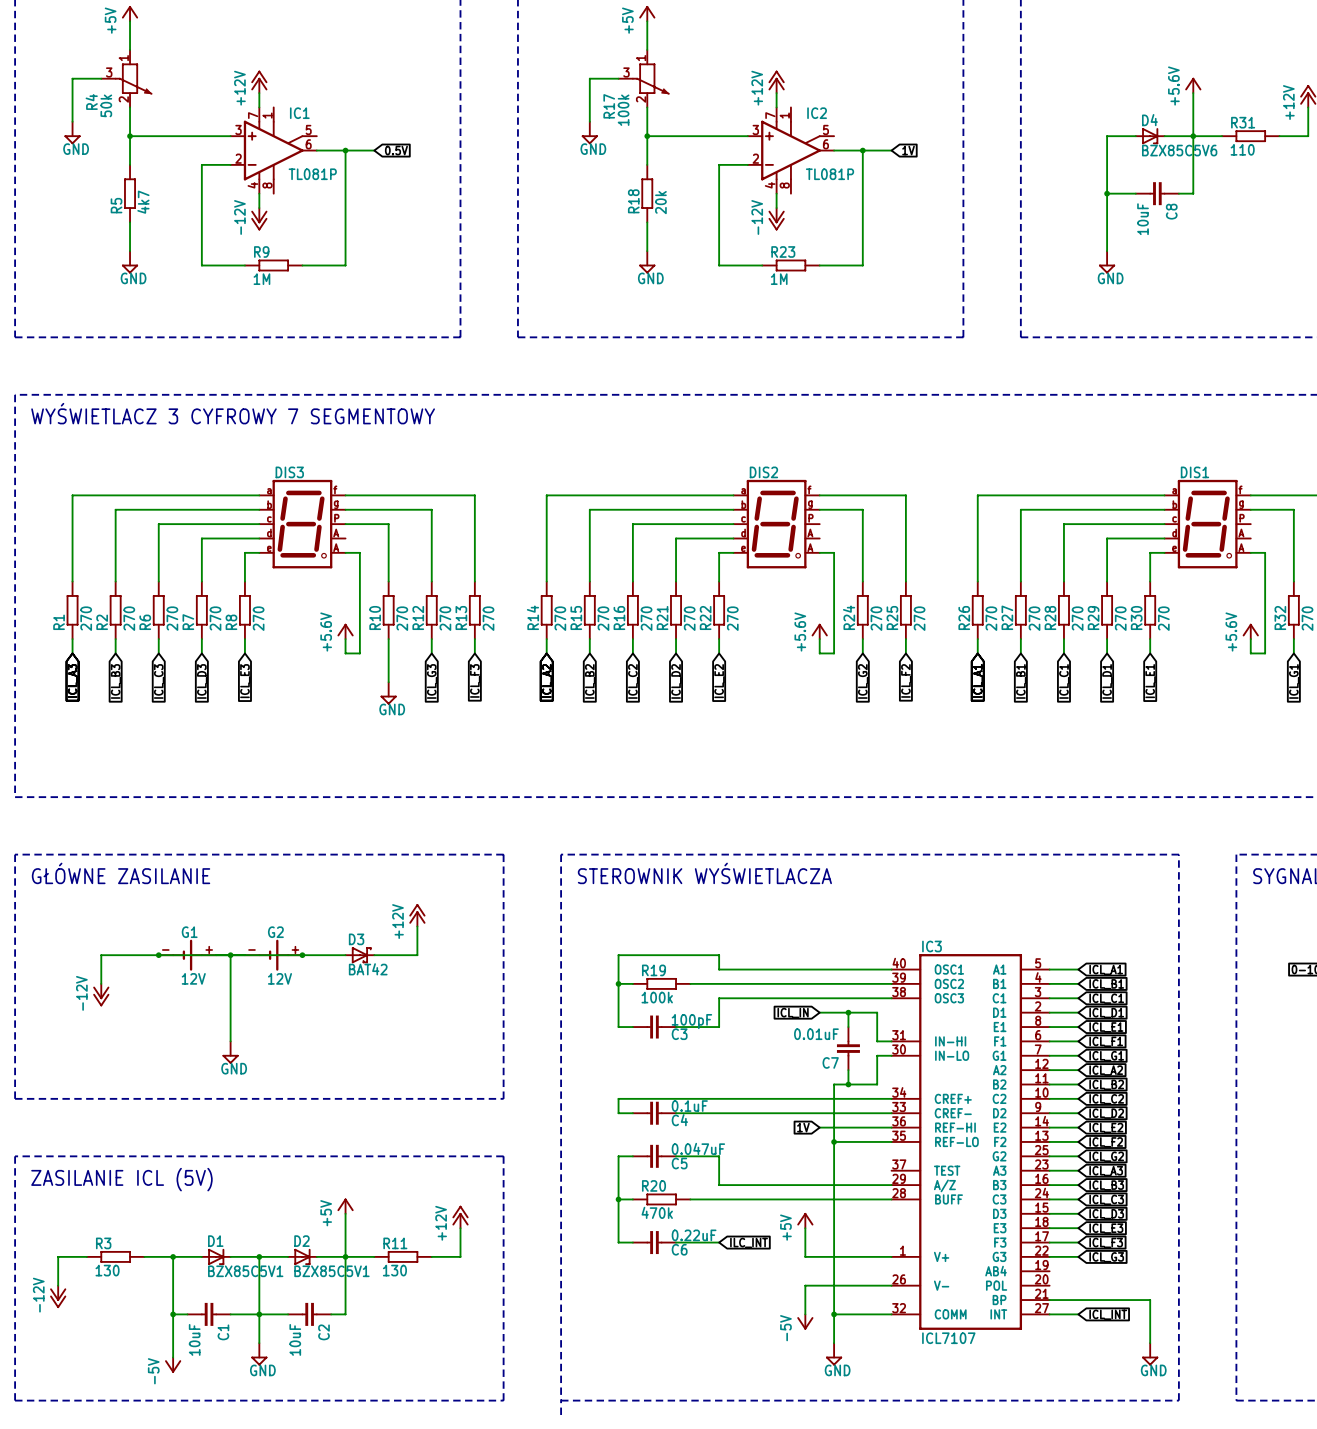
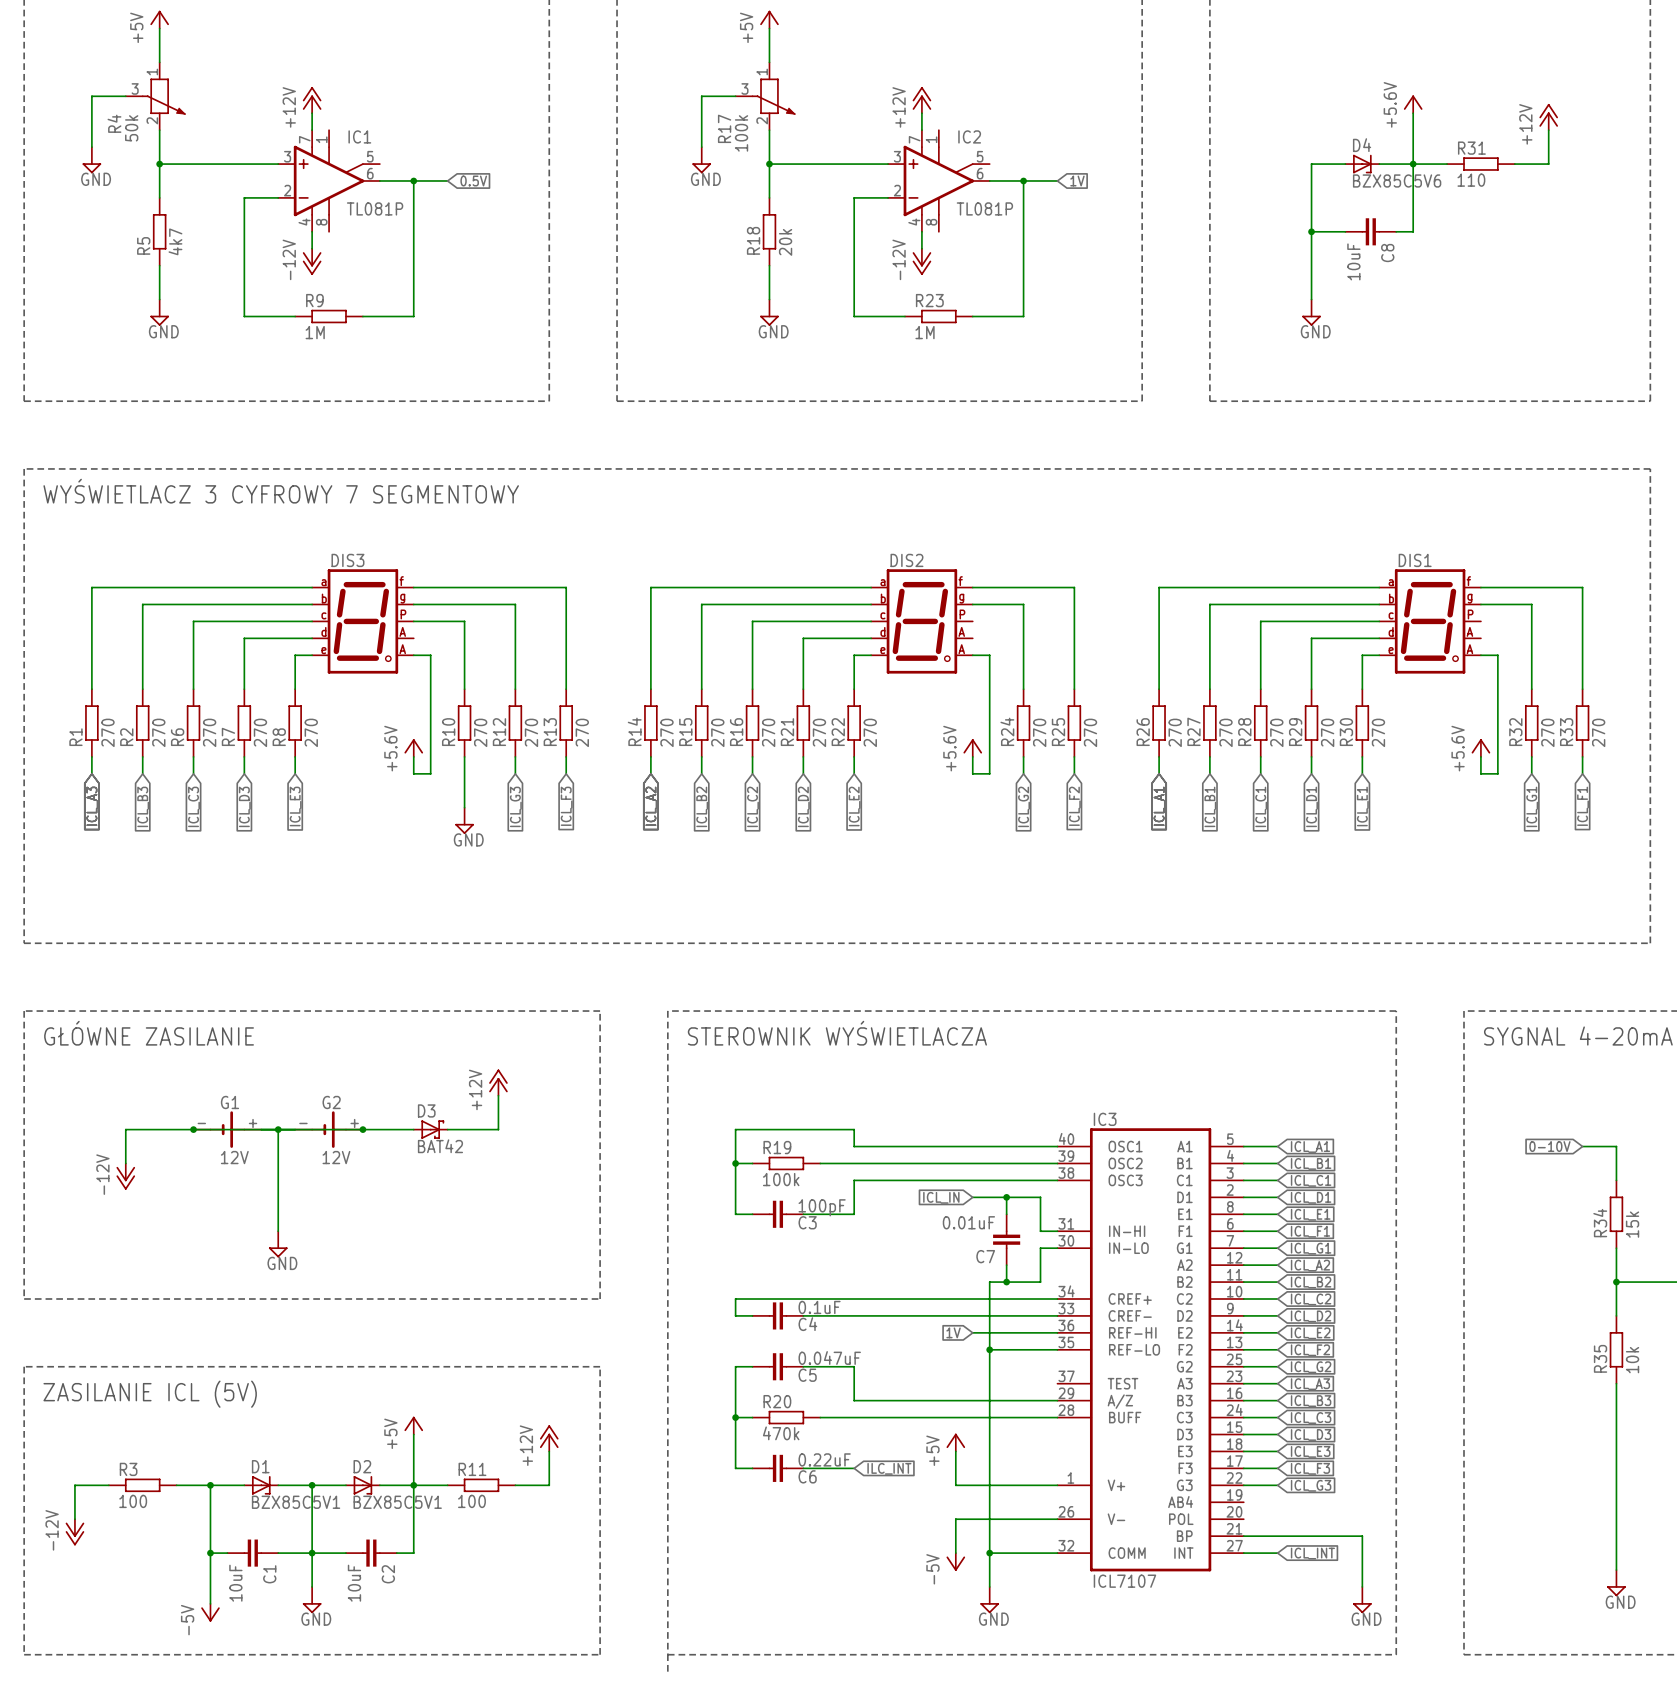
R3 value: 130 (107, 1270) -> 100 (133, 1501)
R11 value: 130 (394, 1270) -> 100 (471, 1501)

